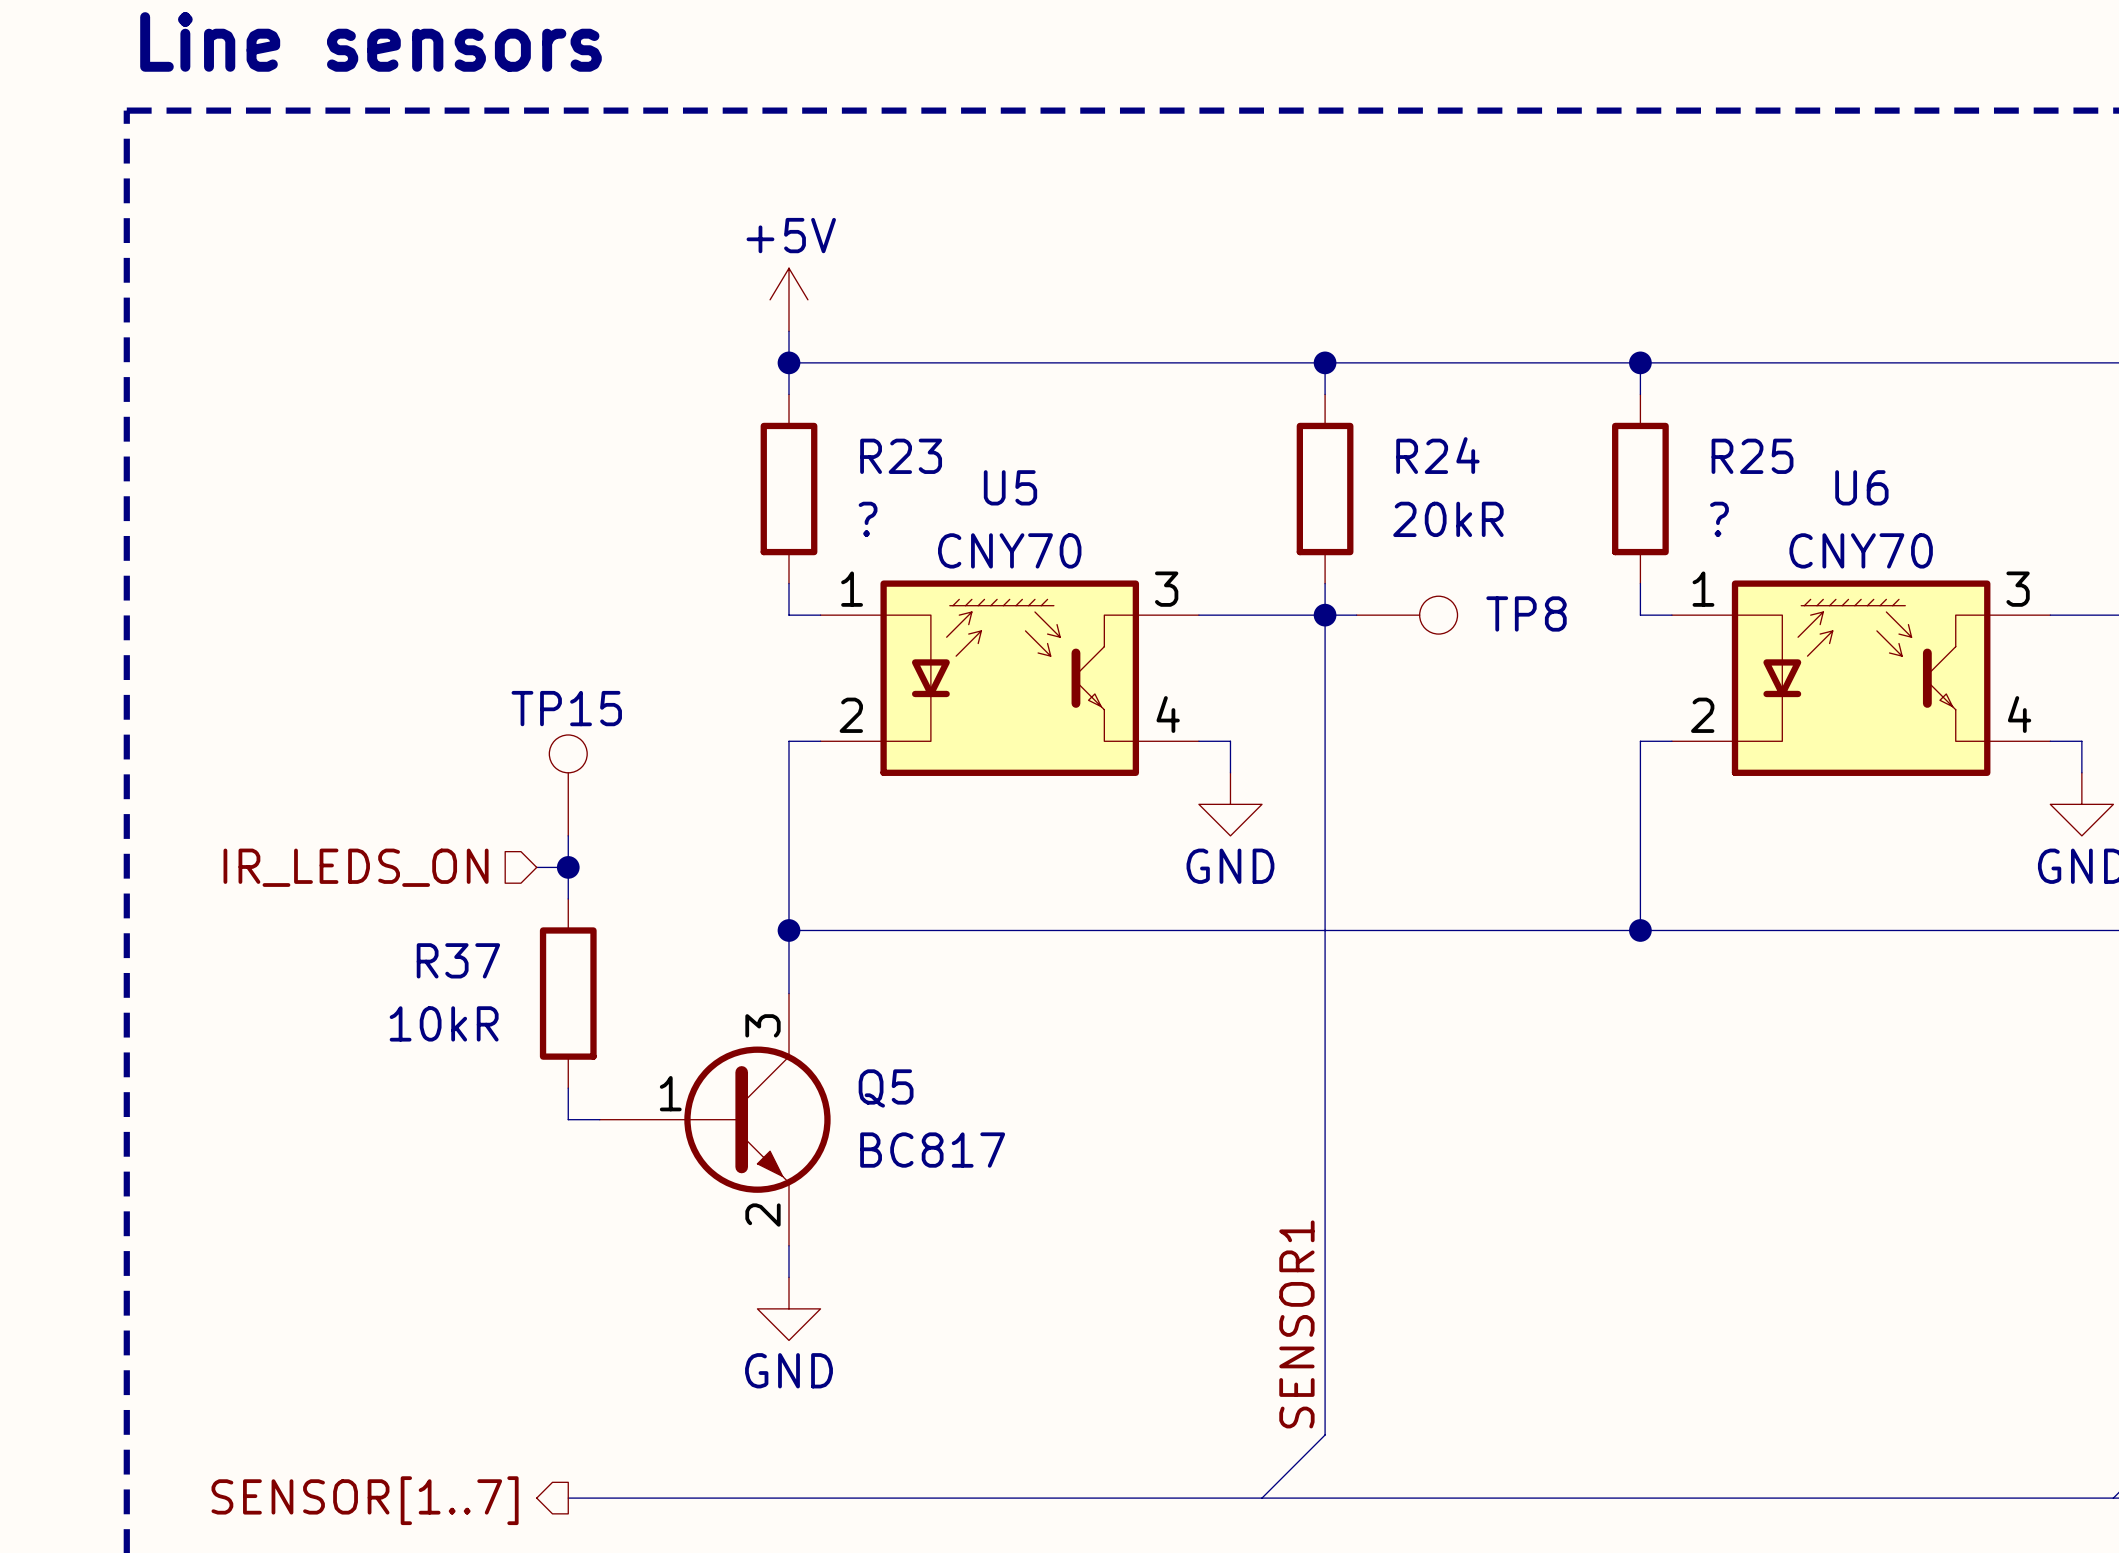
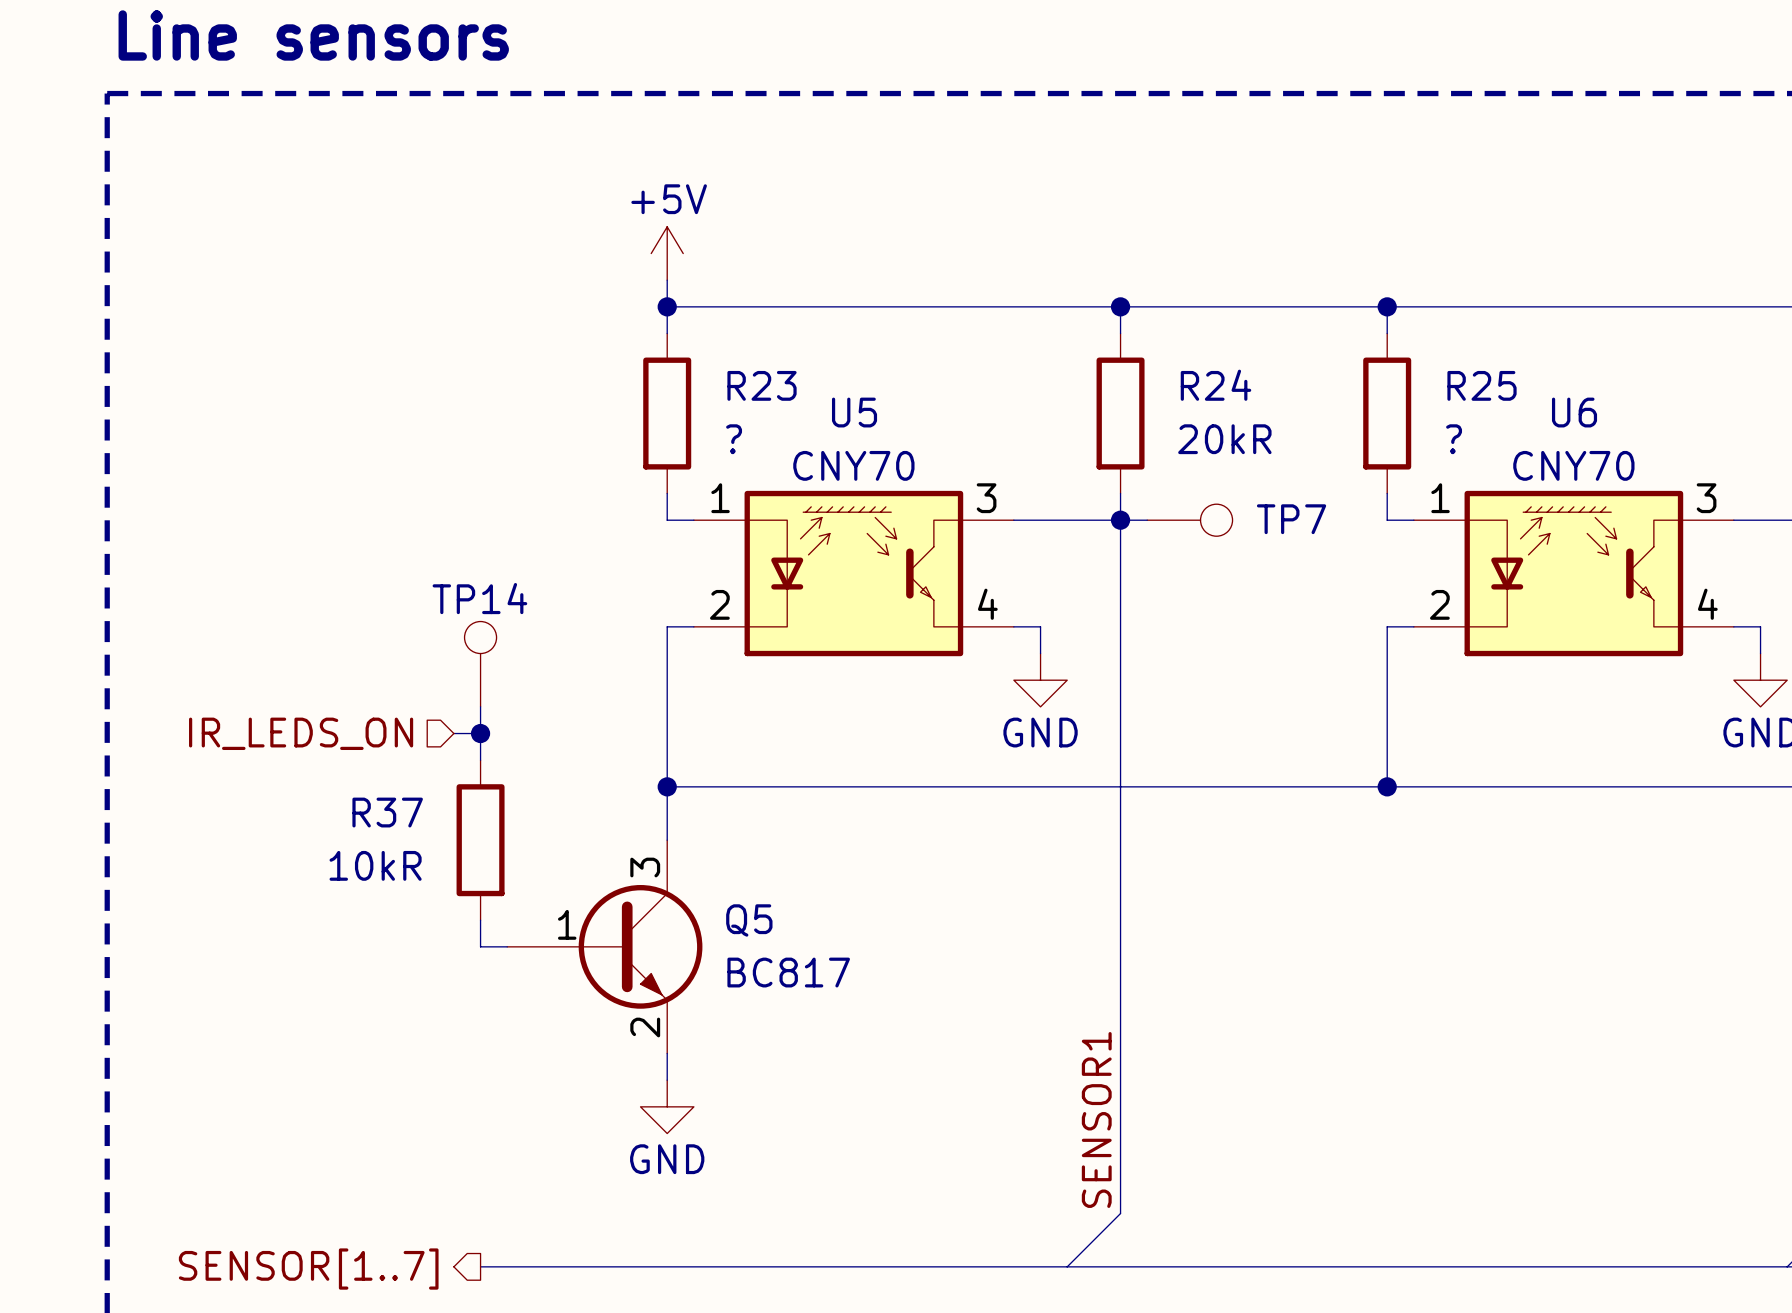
TP8 name: TP8 (1526, 613) -> TP7 (1291, 519)
TP15 name: TP15 (566, 708) -> TP14 (479, 598)

